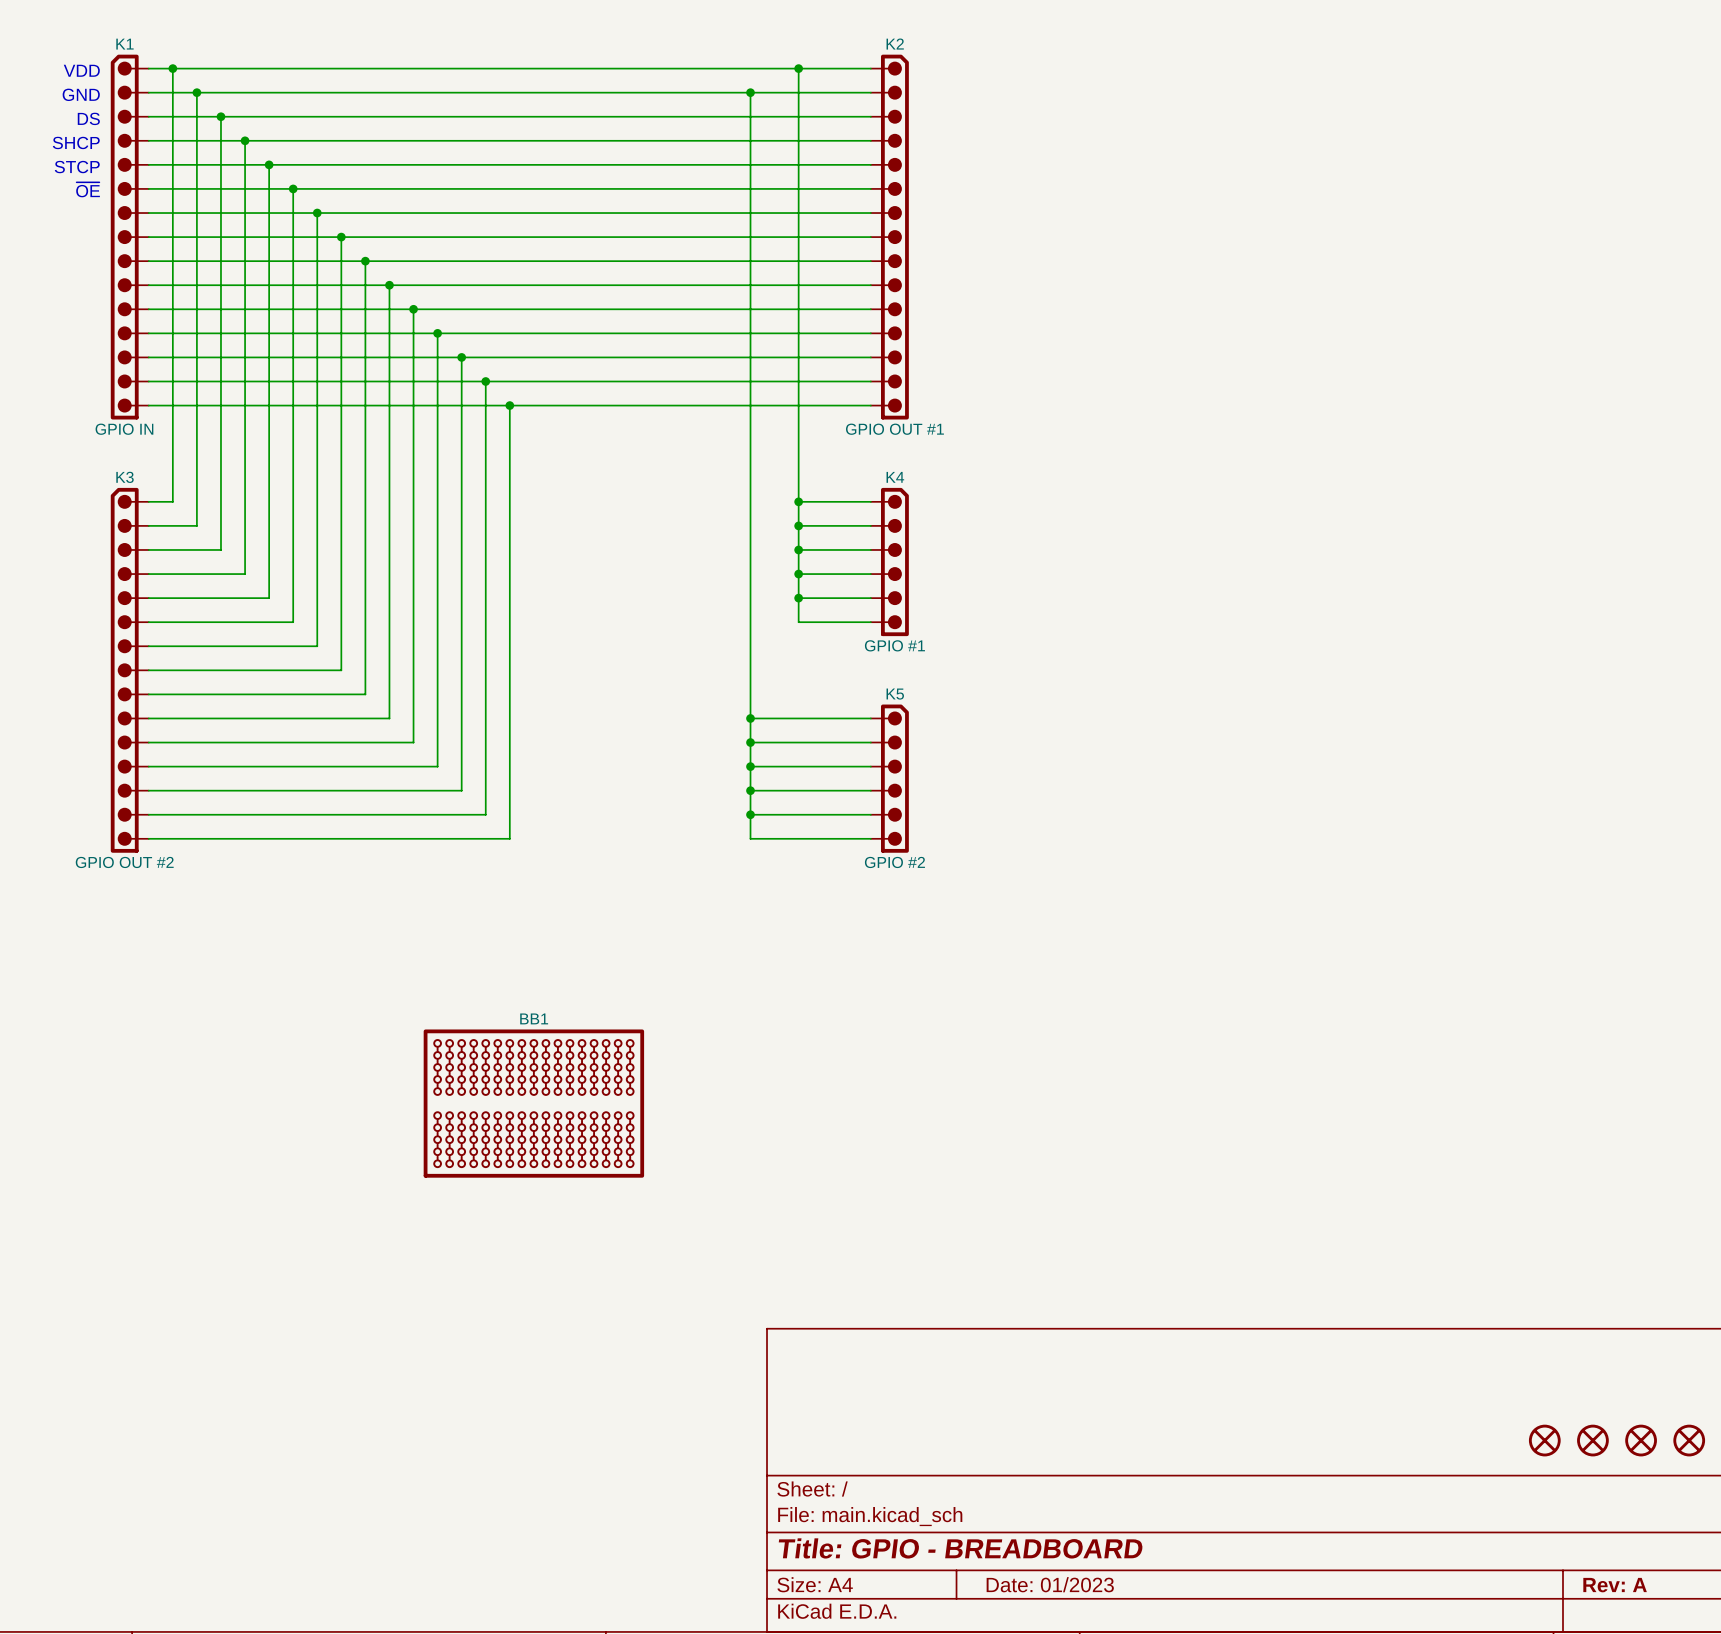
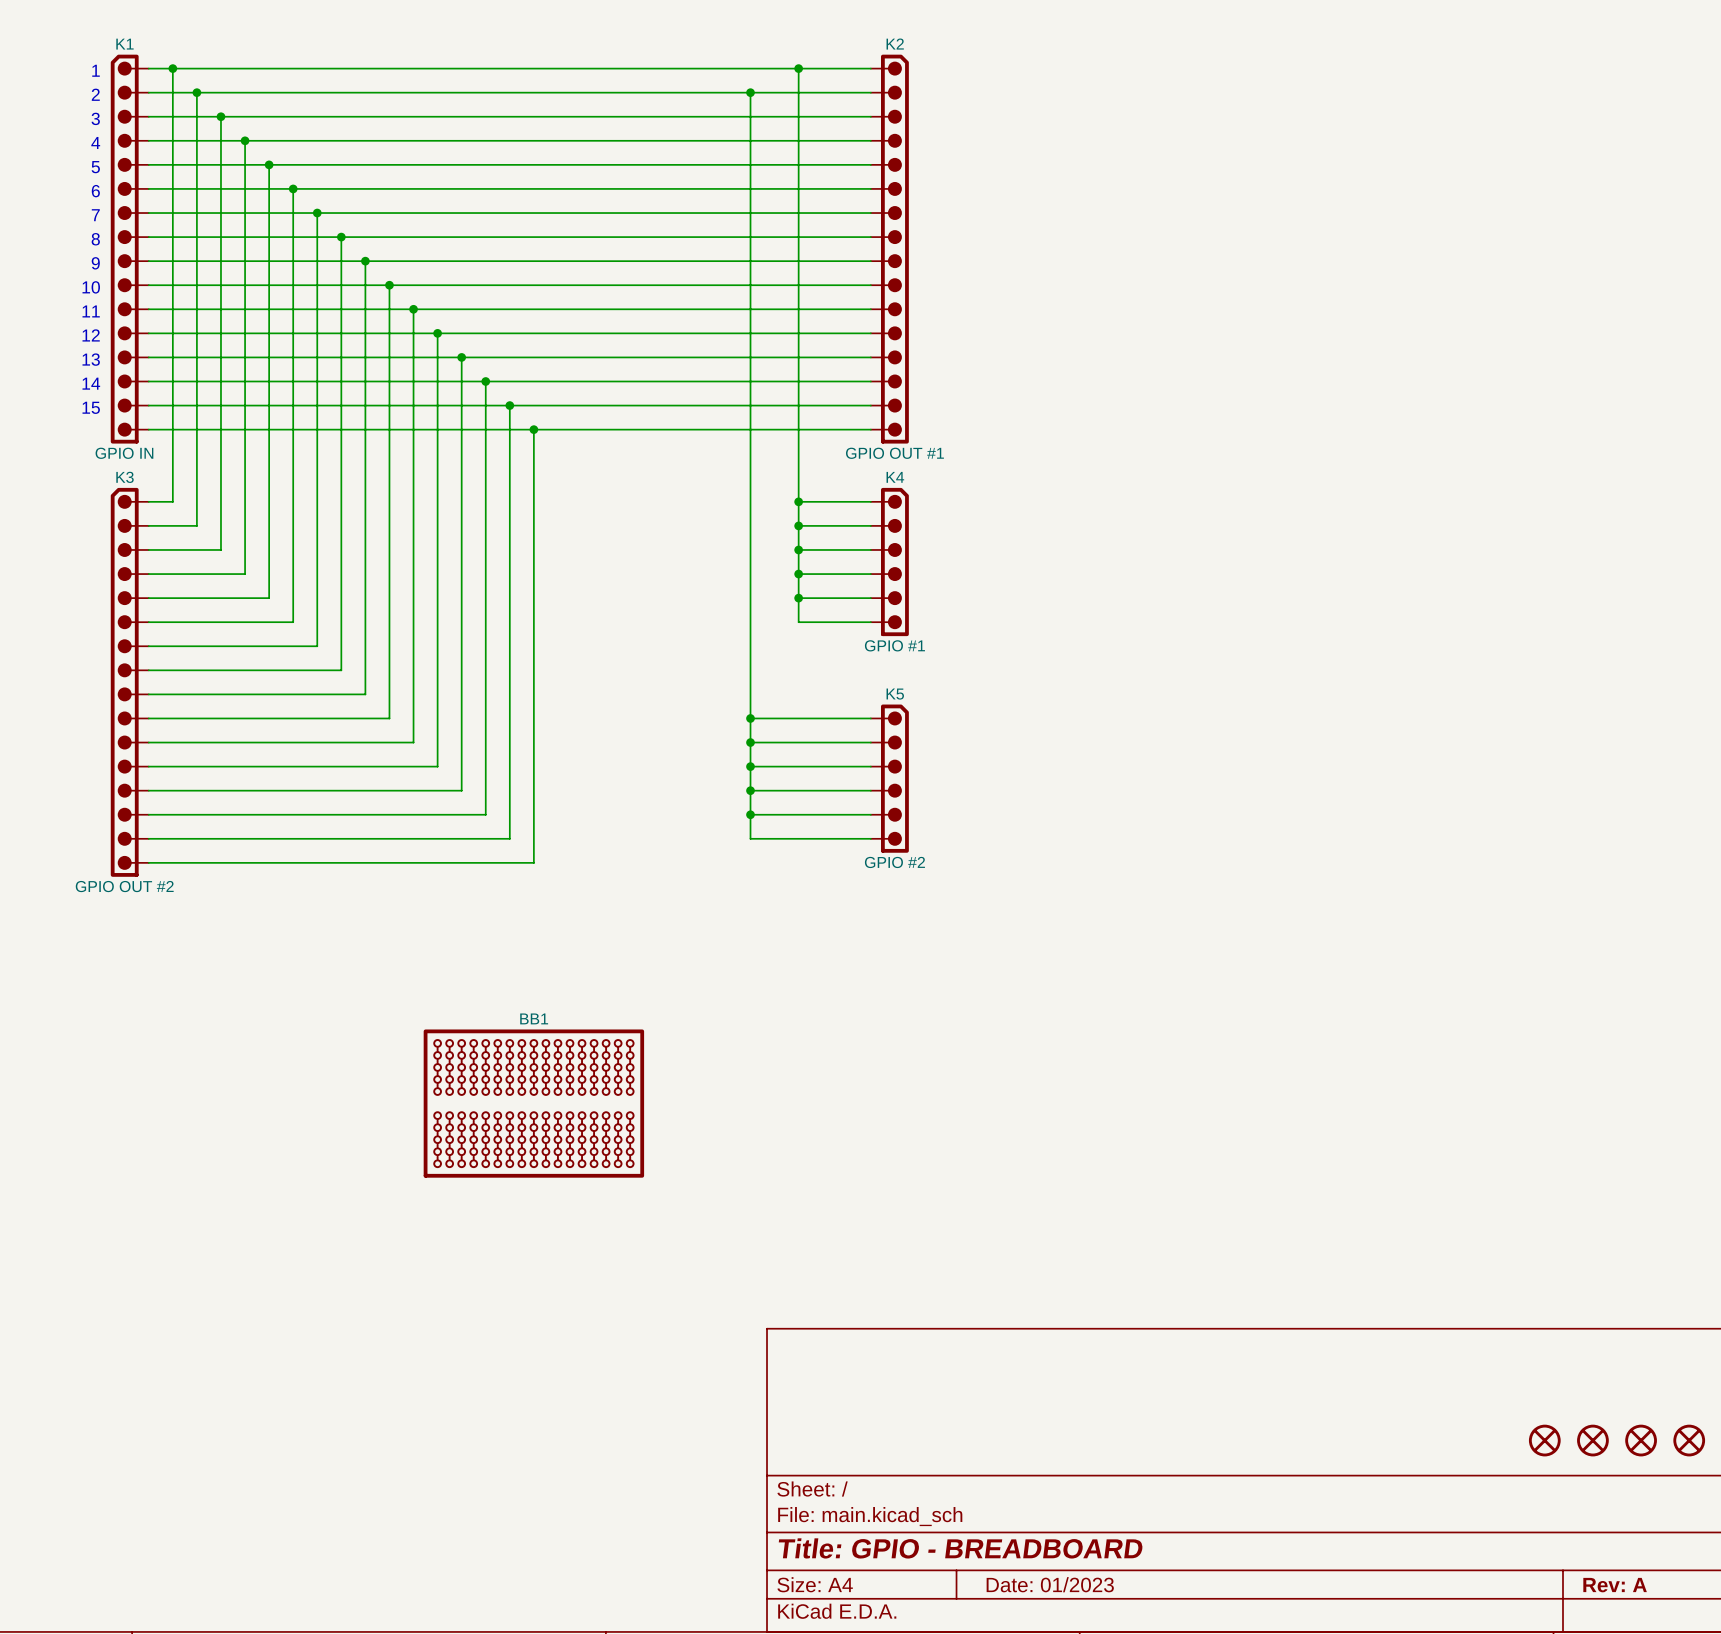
K1 symbol: [110, 54, 149, 420] -> [110, 54, 149, 444]
K2 symbol: [870, 54, 909, 420] -> [870, 54, 909, 444]
text: VDD (81, 70) -> 1 (96, 70)
text: GND (81, 94) -> 2 (95, 94)
text: DS (88, 118) -> 3 (95, 118)
text: SHCP (76, 142) -> 4 (95, 142)
text: STCP (77, 167) -> 5 (95, 167)
text: ~{OE} (88, 189) -> 6 (95, 191)
text: none -> 7 (95, 215)
text: none -> 8 (95, 239)
text: none -> 9 (95, 263)
text: none -> 10 (91, 287)
text: none -> 11 (91, 311)
text: none -> 12 (91, 335)
text: none -> 13 (91, 359)
text: none -> 14 (91, 383)
text: none -> 15 (91, 407)
wire: none -> (148, 429) (870, 429)
wire: none -> (533, 429) (533, 862) (148, 862)
junction: none -> (533, 429)
K3 symbol: [110, 487, 149, 853] -> [110, 487, 149, 877]

